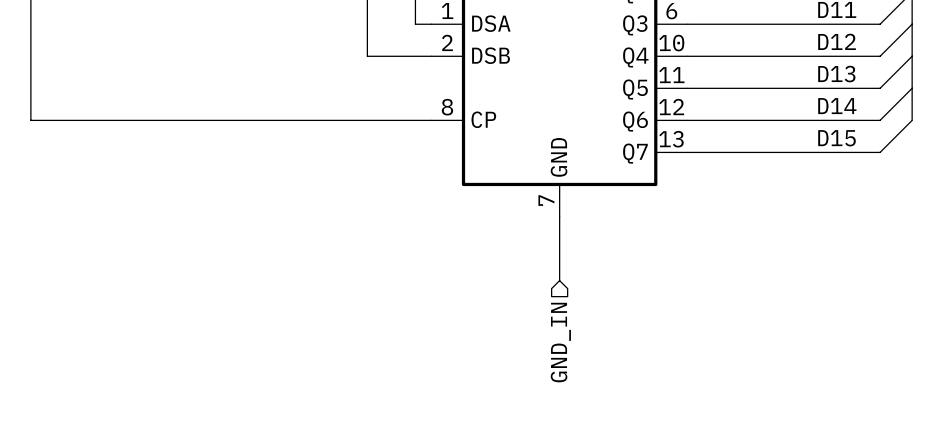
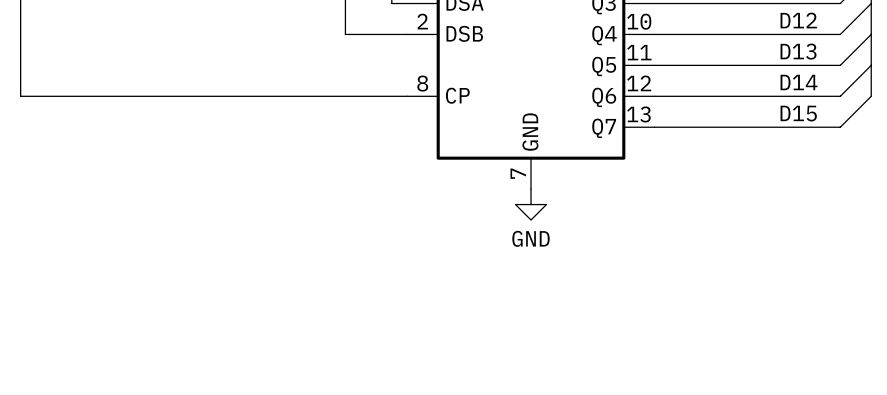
wire: (559, 216) (559, 280) -> none
power symbol: none -> GND (531, 204)
hierarchical label: GND_IN (560, 342) -> none

